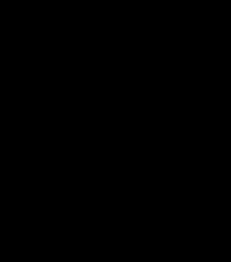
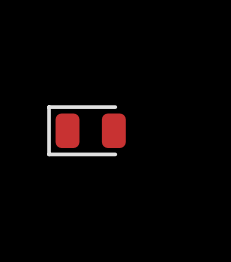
part: none -> (86, 130)

